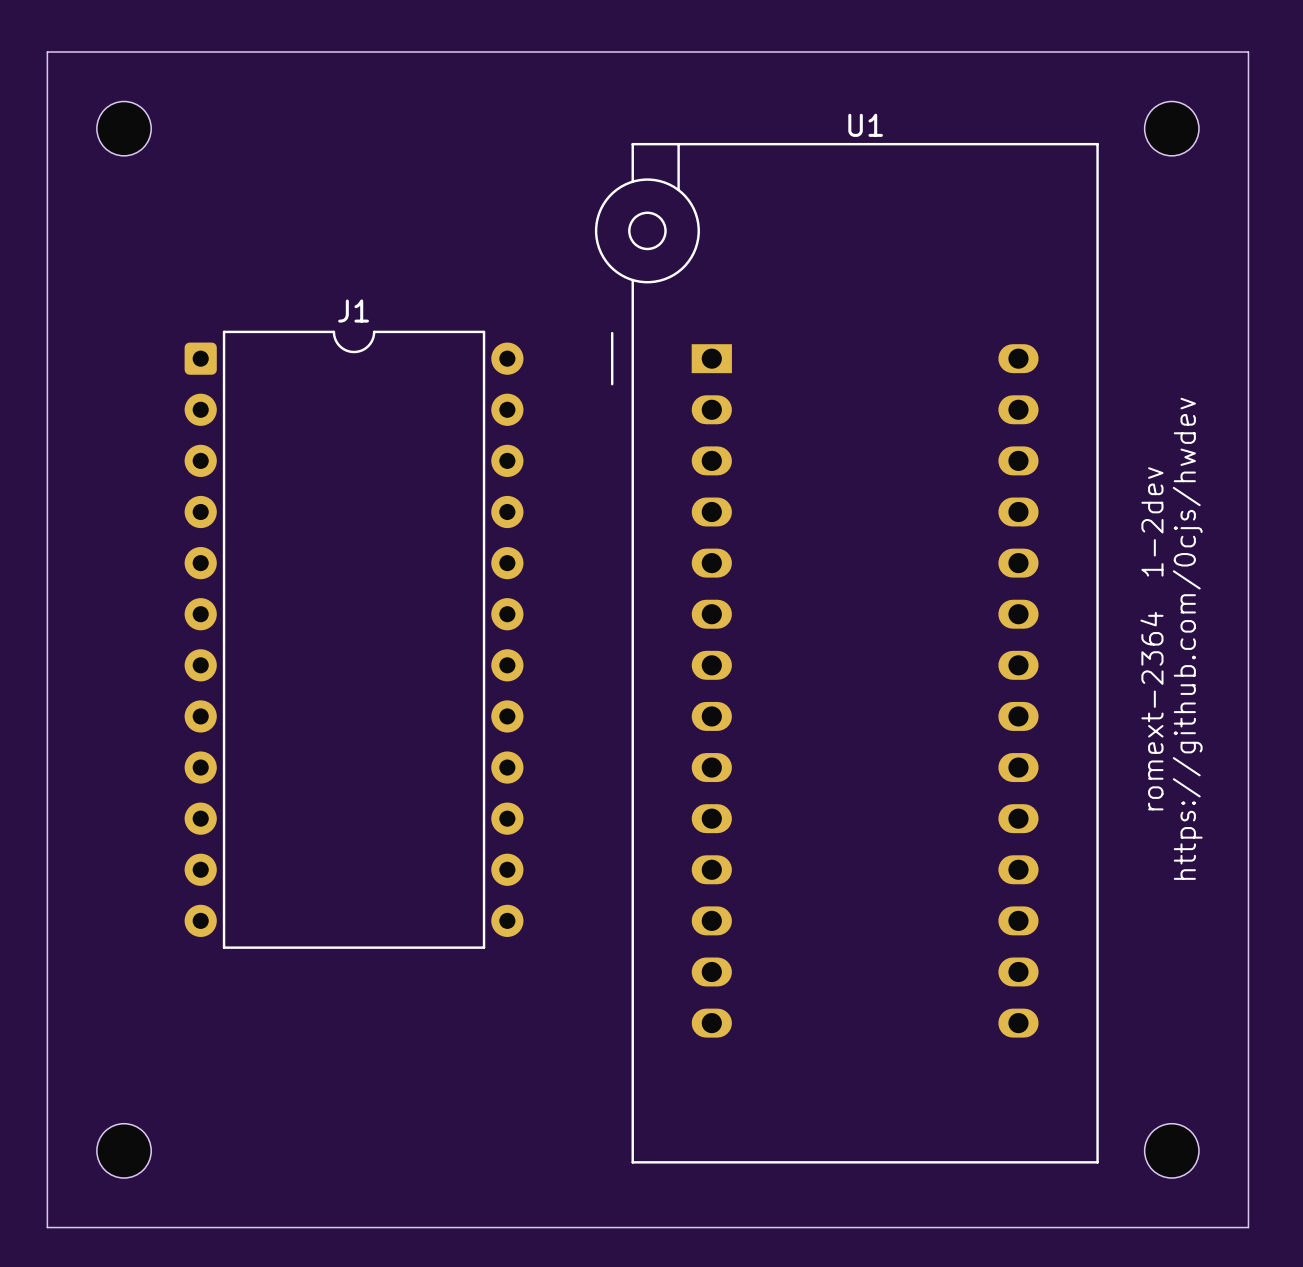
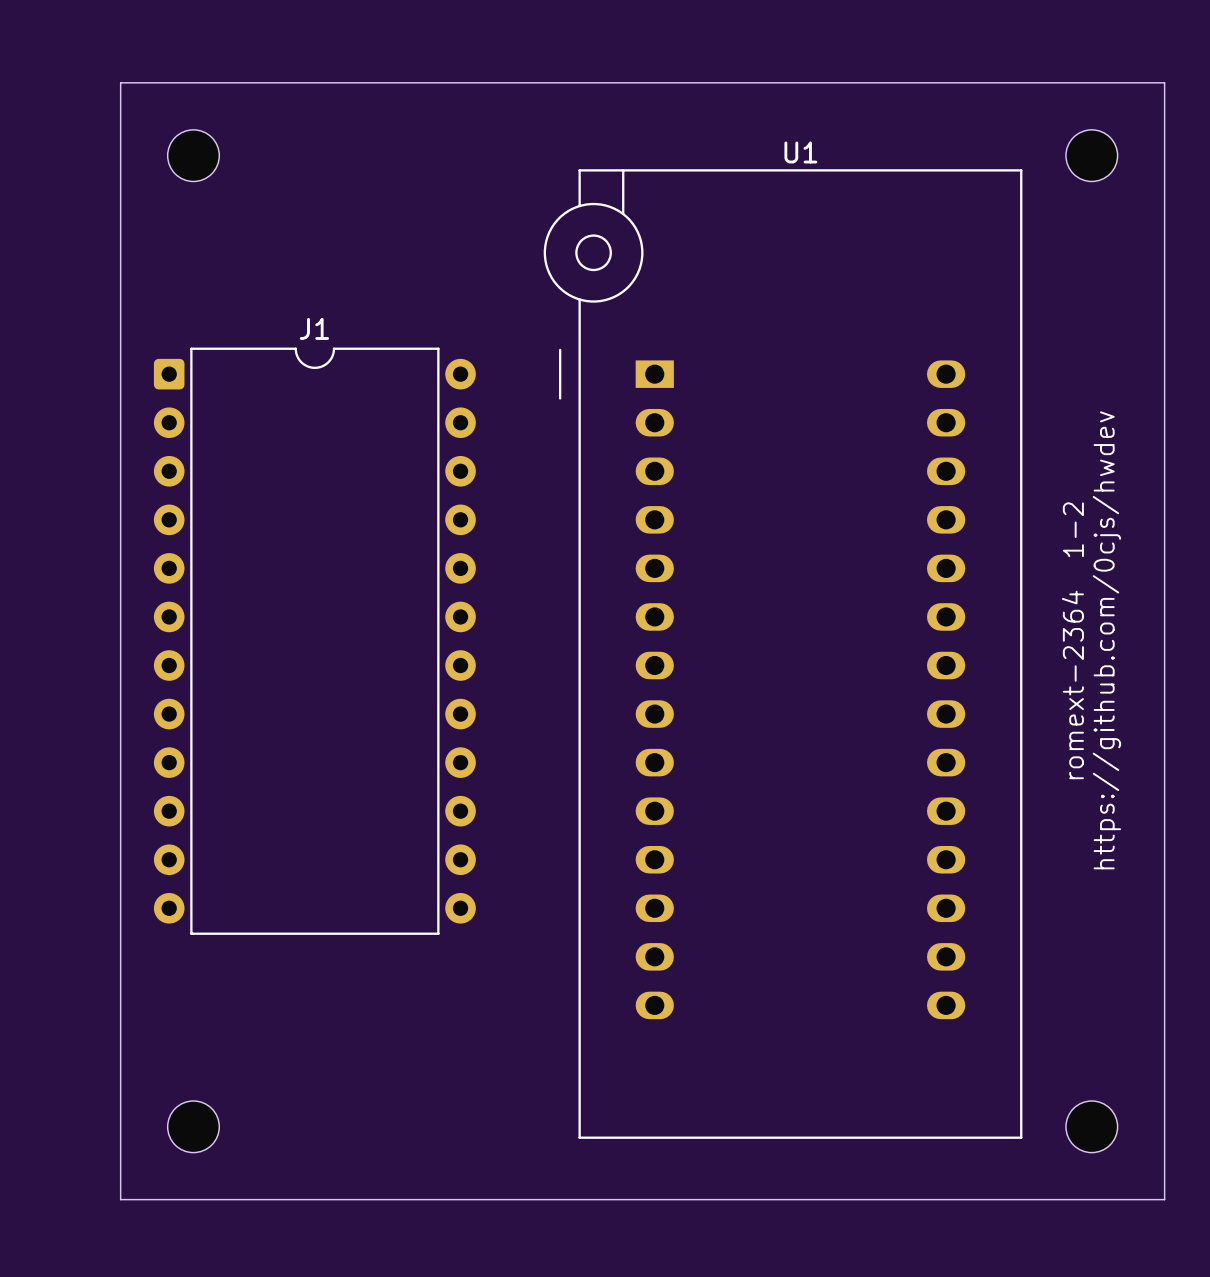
board edge: (149, 52) (47, 52) (47, 1227) (149, 1227) -> (120, 82) (120, 1199)
part position: (124, 128) -> (193, 155)
text: romext-2364 1-2dev (1151, 638) -> romext-2364 1-2 (1072, 640)
part position: (124, 1150) -> (193, 1126)

